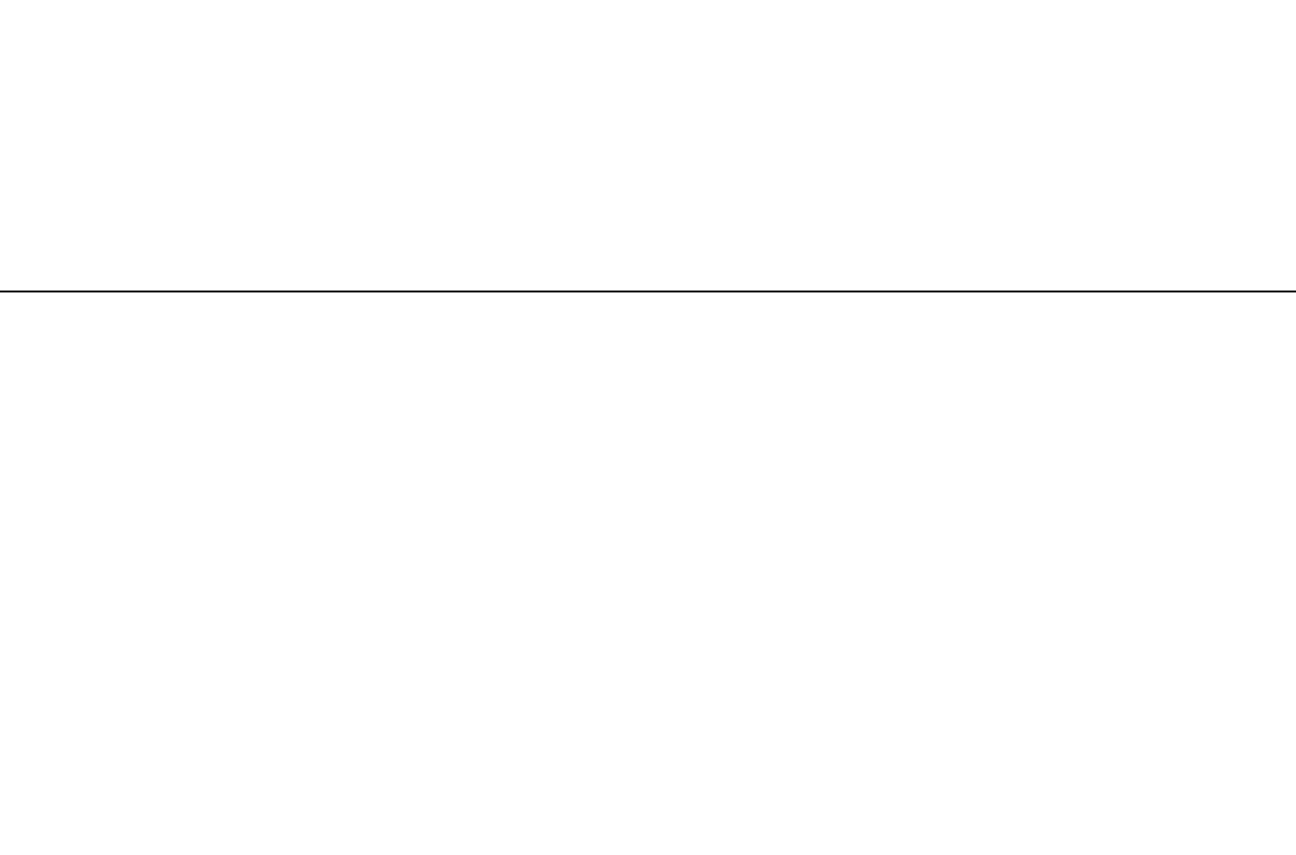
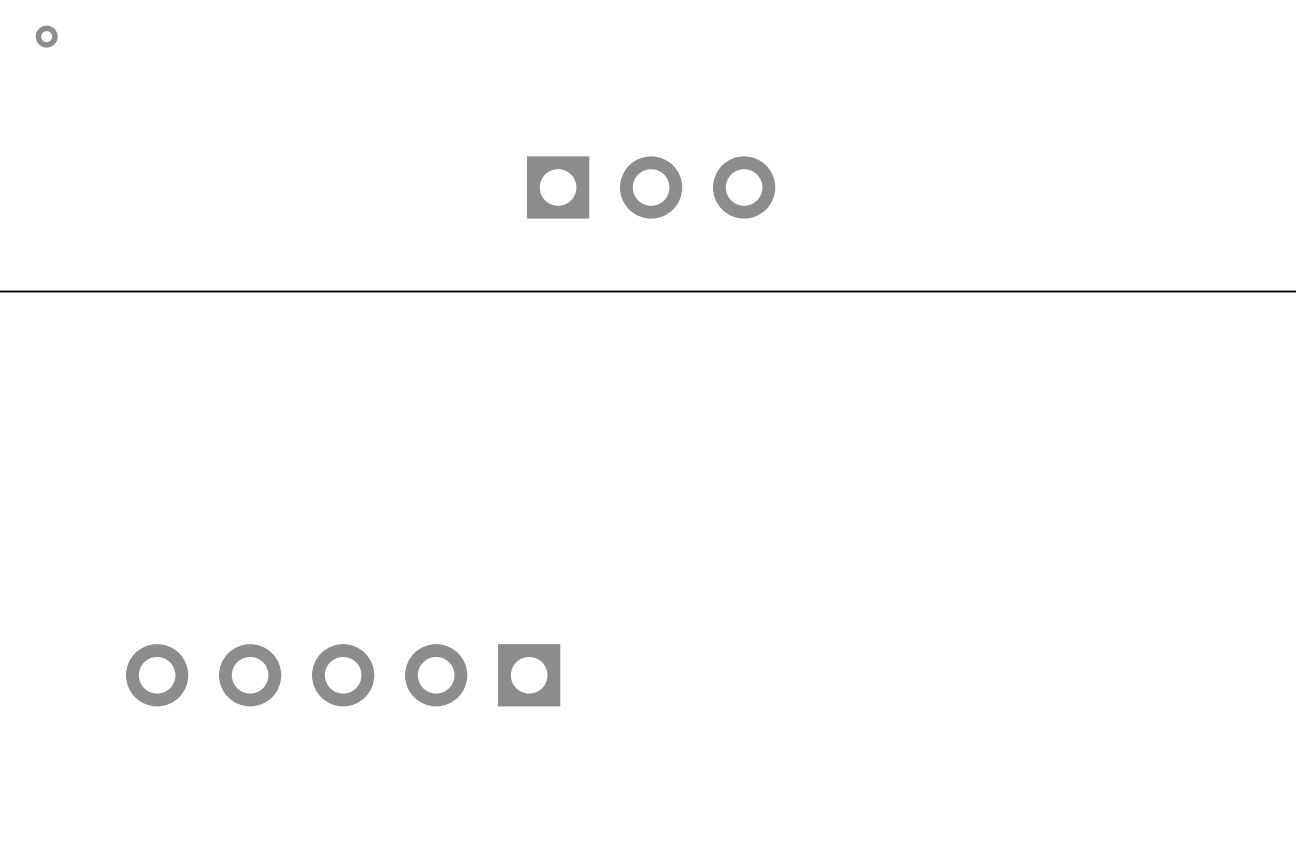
via: none -> (46, 36)
part: none -> (651, 187)
part: none -> (343, 675)

